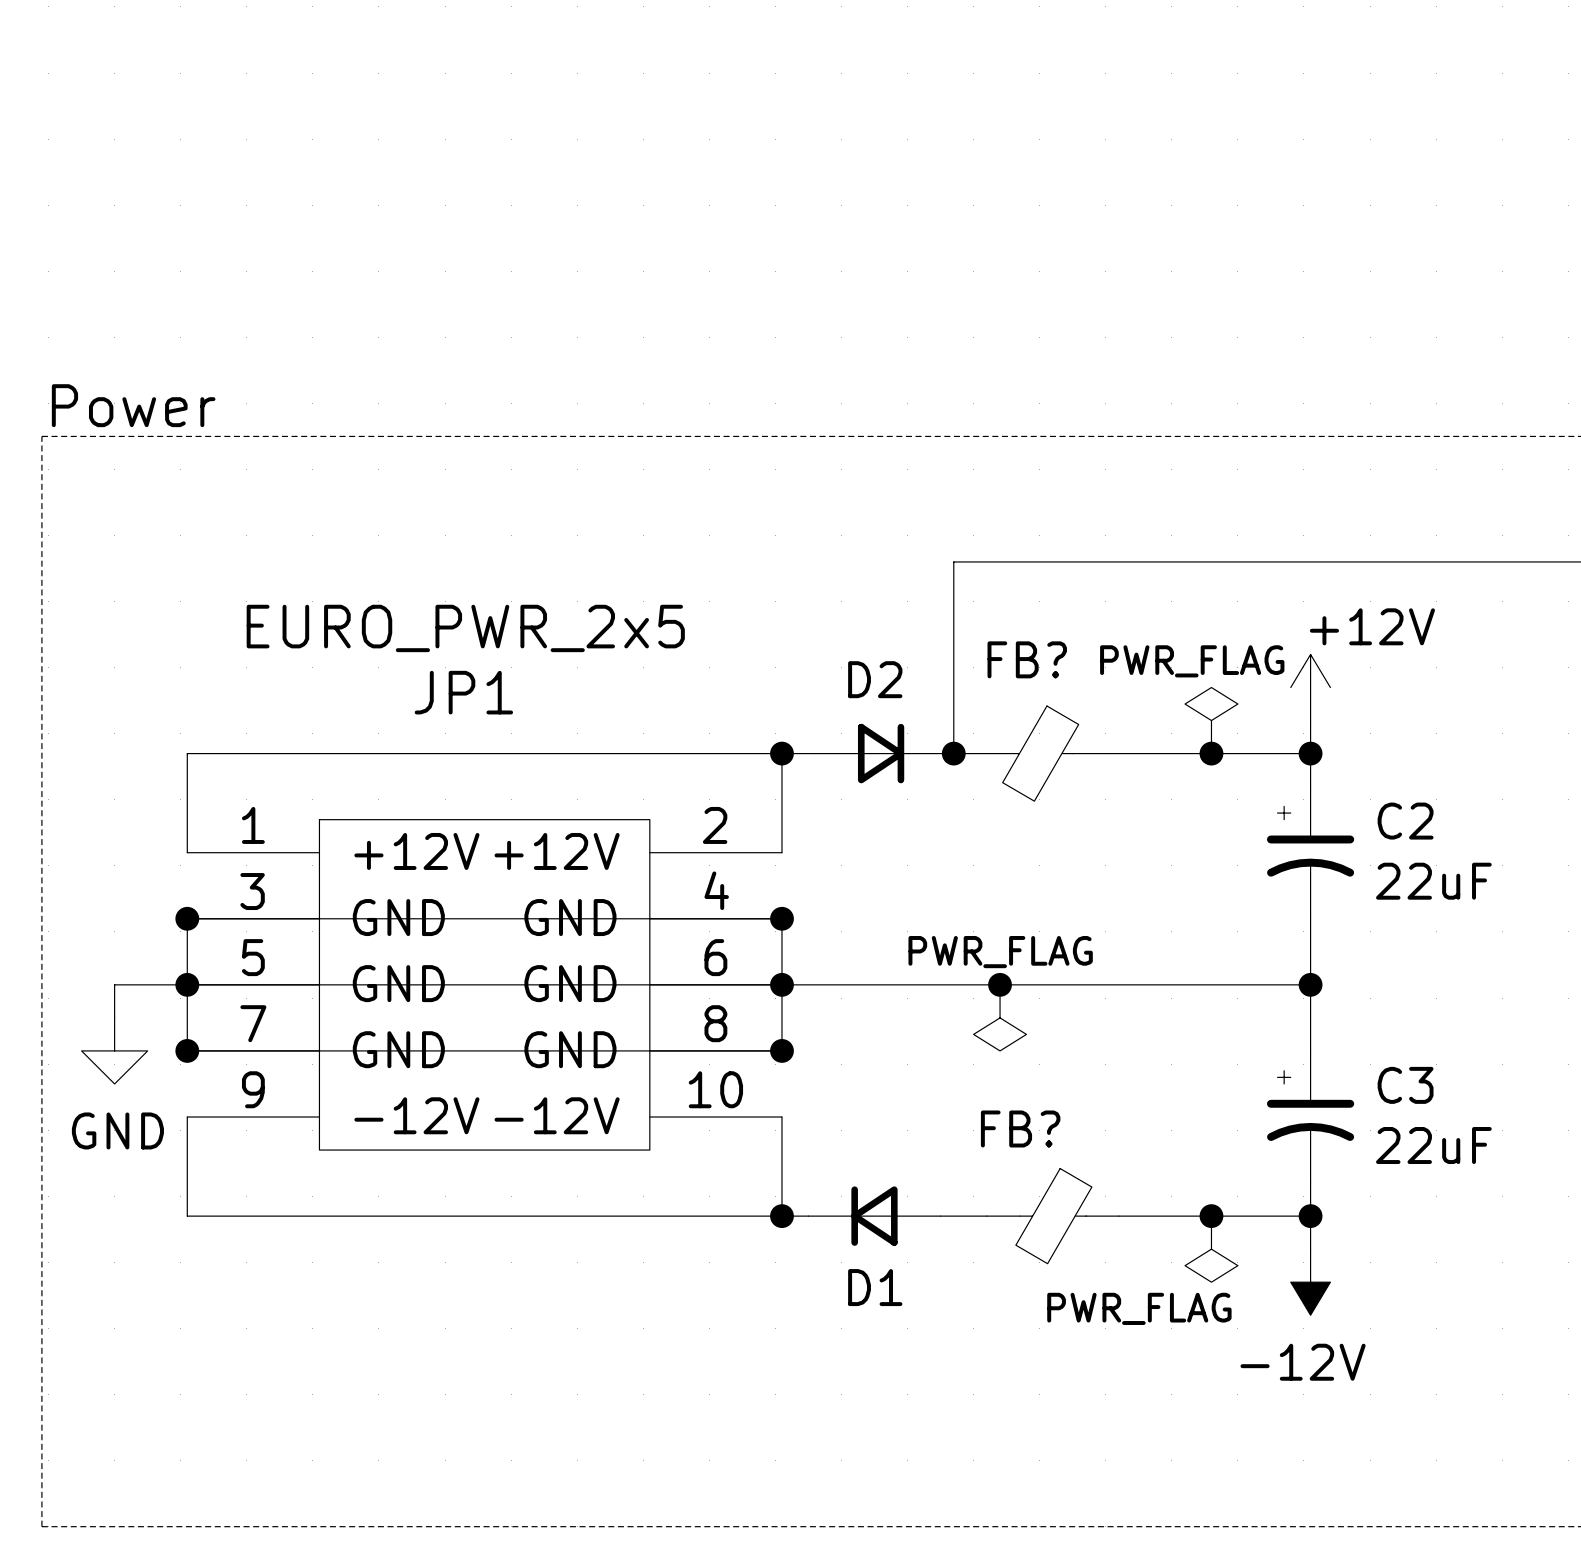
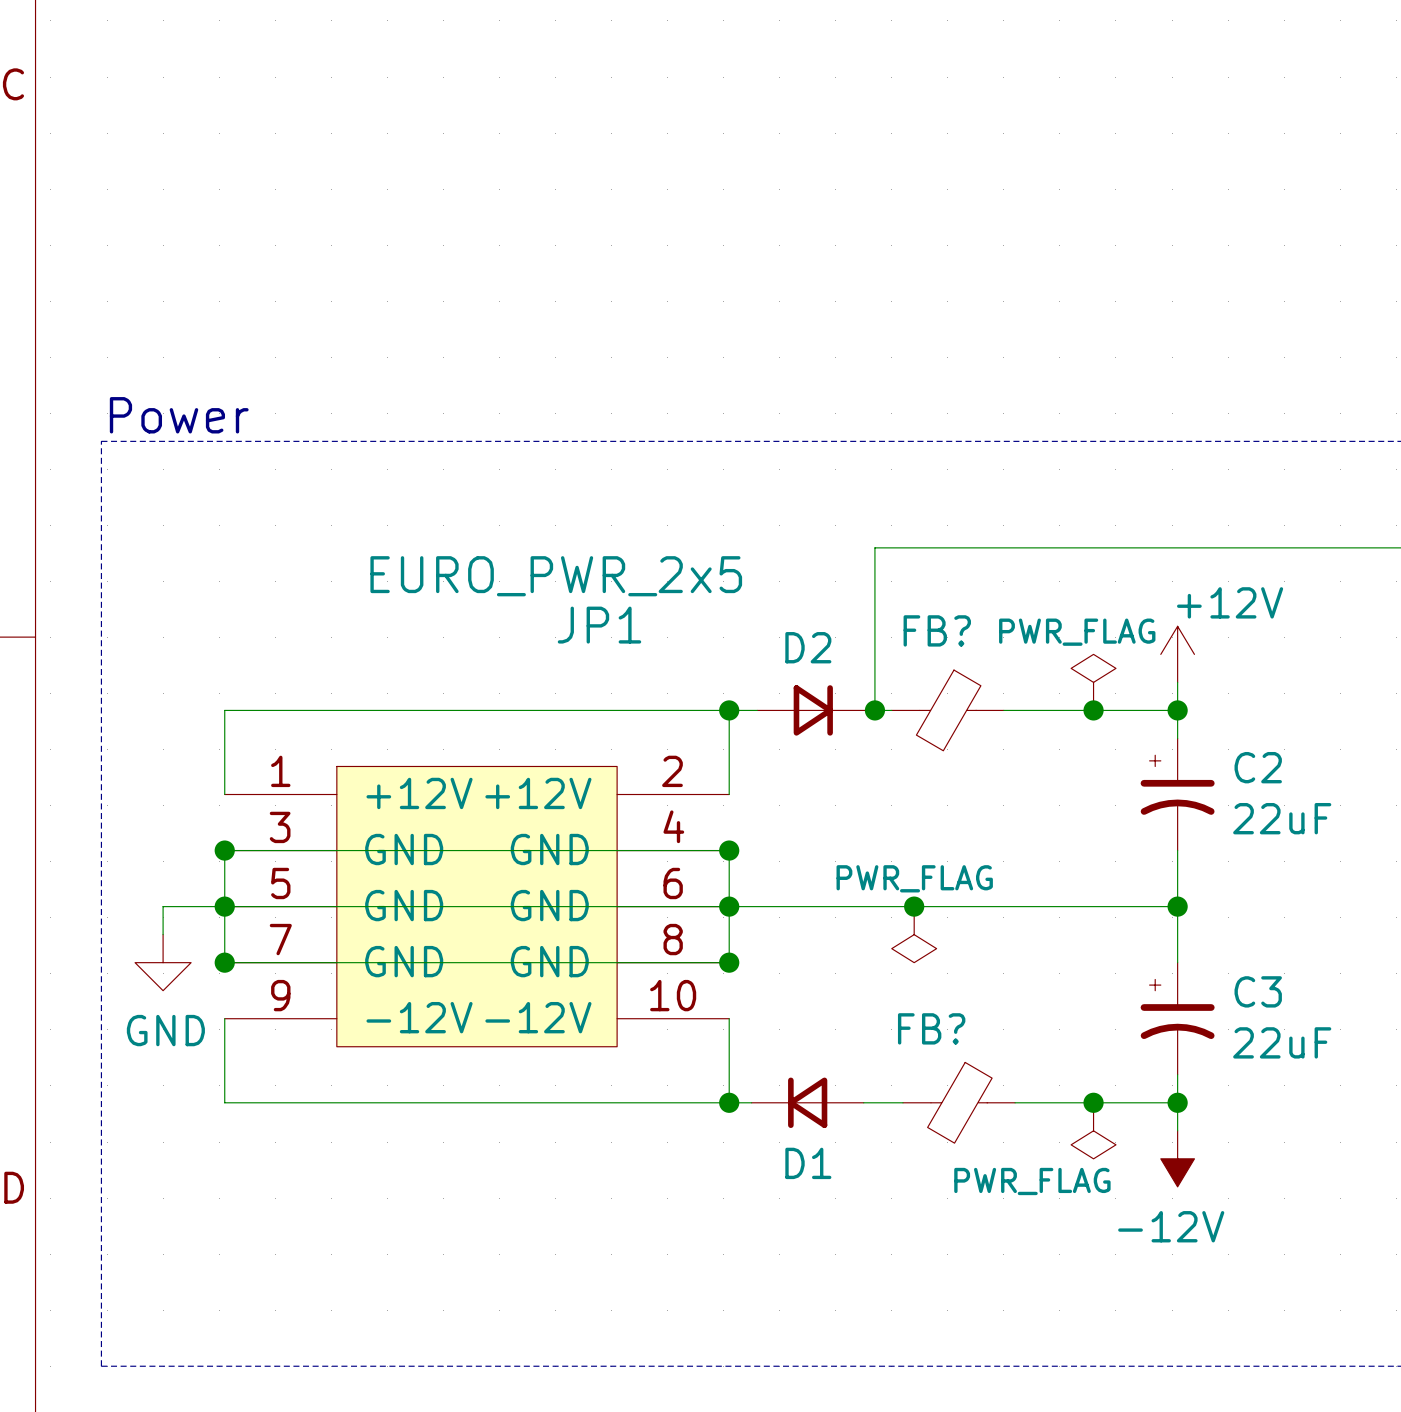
JP1 value position: EURO_PWR_2x5 (465, 628) -> EURO_PWR_2x5 (556, 576)
JP1 name position: JP1 (463, 692) -> JP1 (599, 625)

